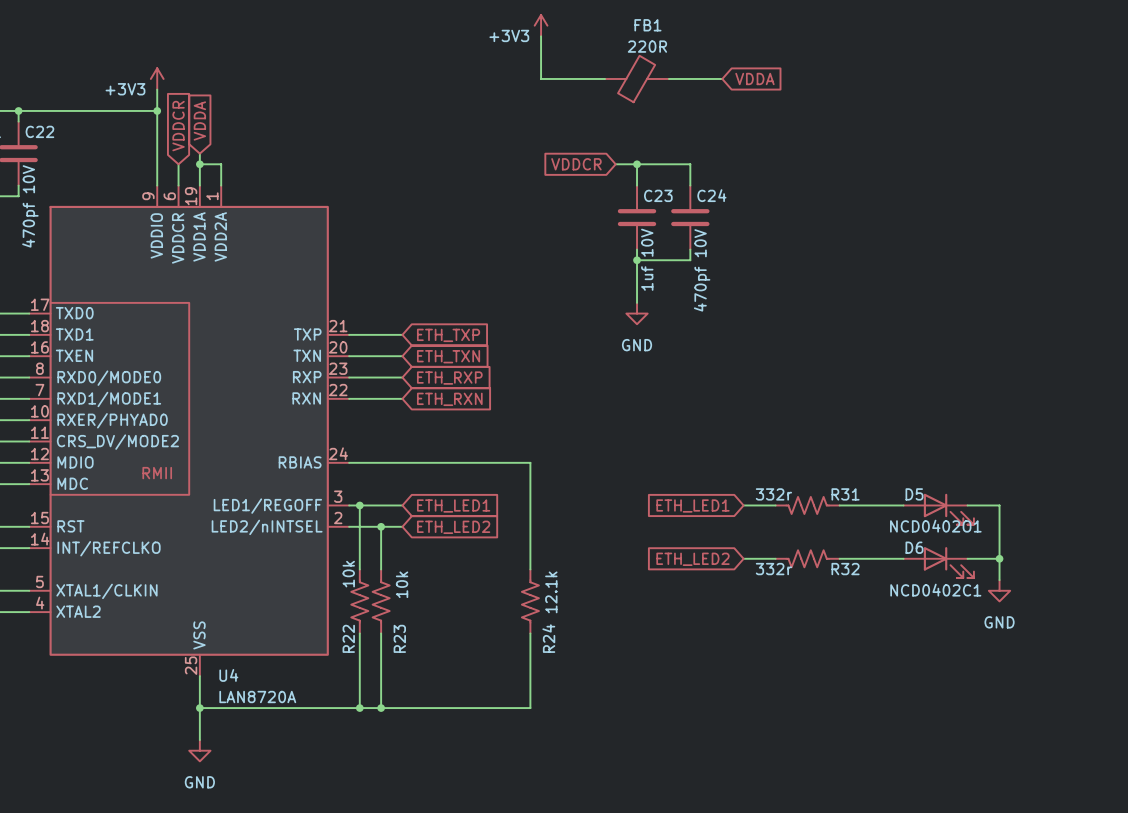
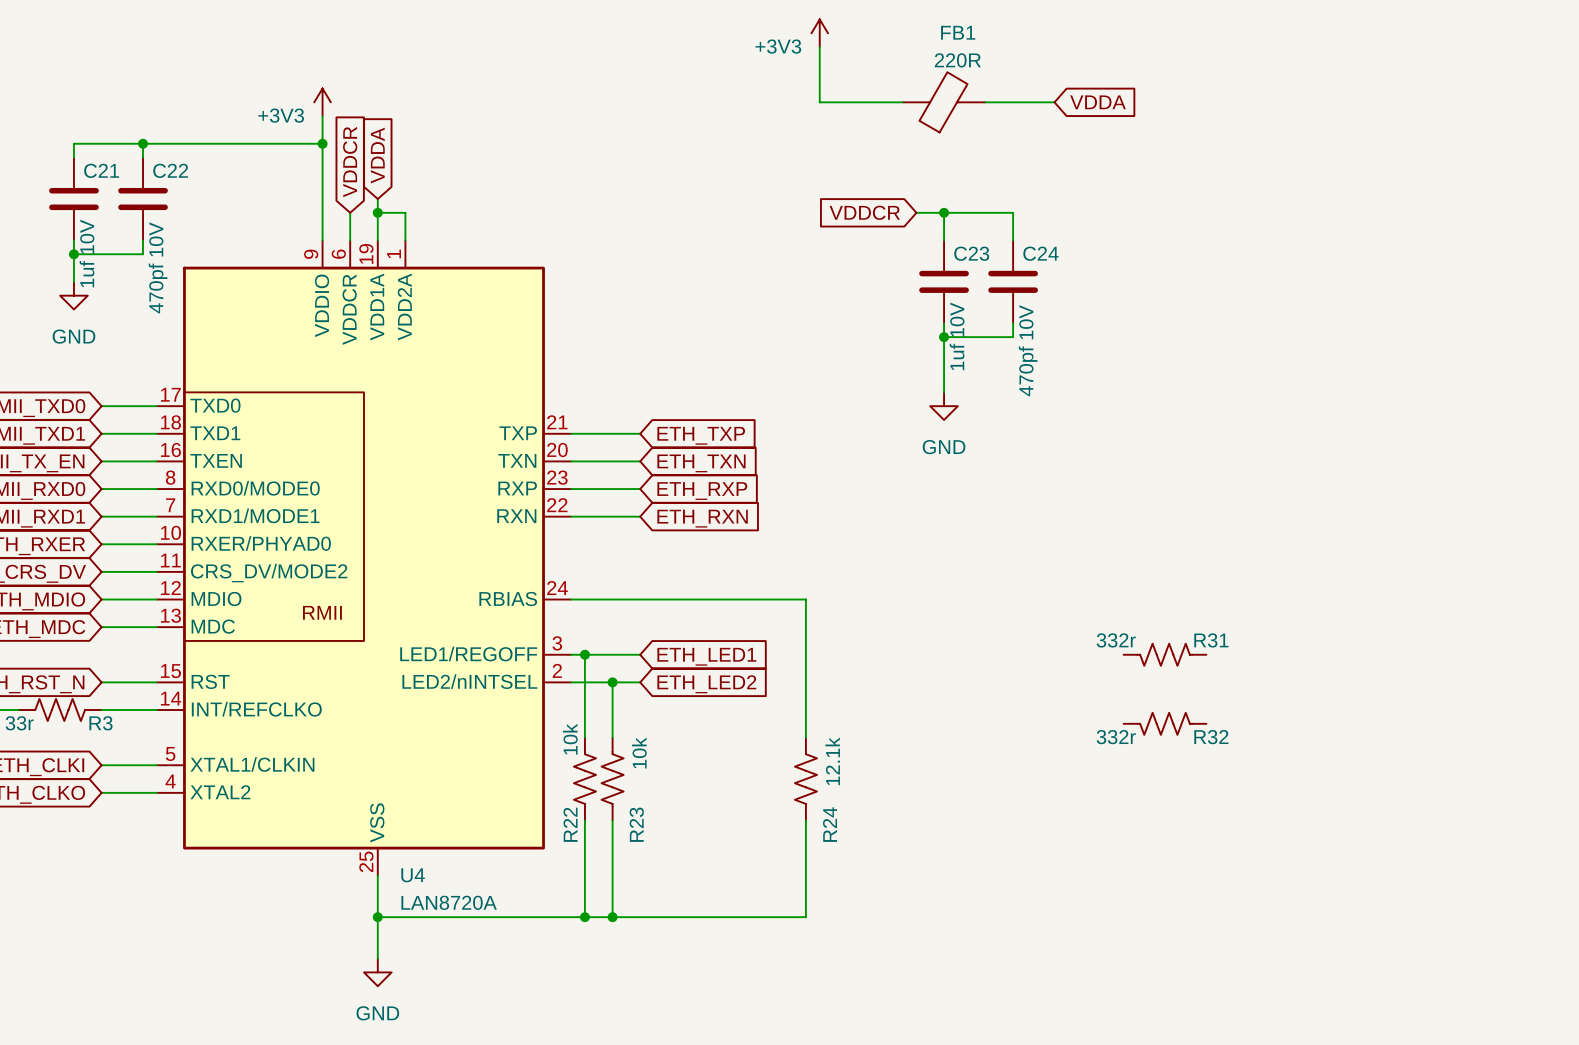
global label: ETH_LED1 (692, 505) -> none
wire: (743, 505) (775, 505) -> none
wire: (839, 505) (903, 505) -> none
wire: (967, 505) (999, 505) (999, 580) -> none
D5: NCD0402O1 (938, 509) -> none
wire: (743, 558) (775, 558) -> none
wire: (839, 558) (903, 558) -> none
wire: (967, 558) (999, 558) -> none
junction: (999, 558) -> none
global label: ETH_LED2 (692, 559) -> none
D6: NCD0402C1 (938, 562) -> none
power symbol: GND (999, 590) -> none

